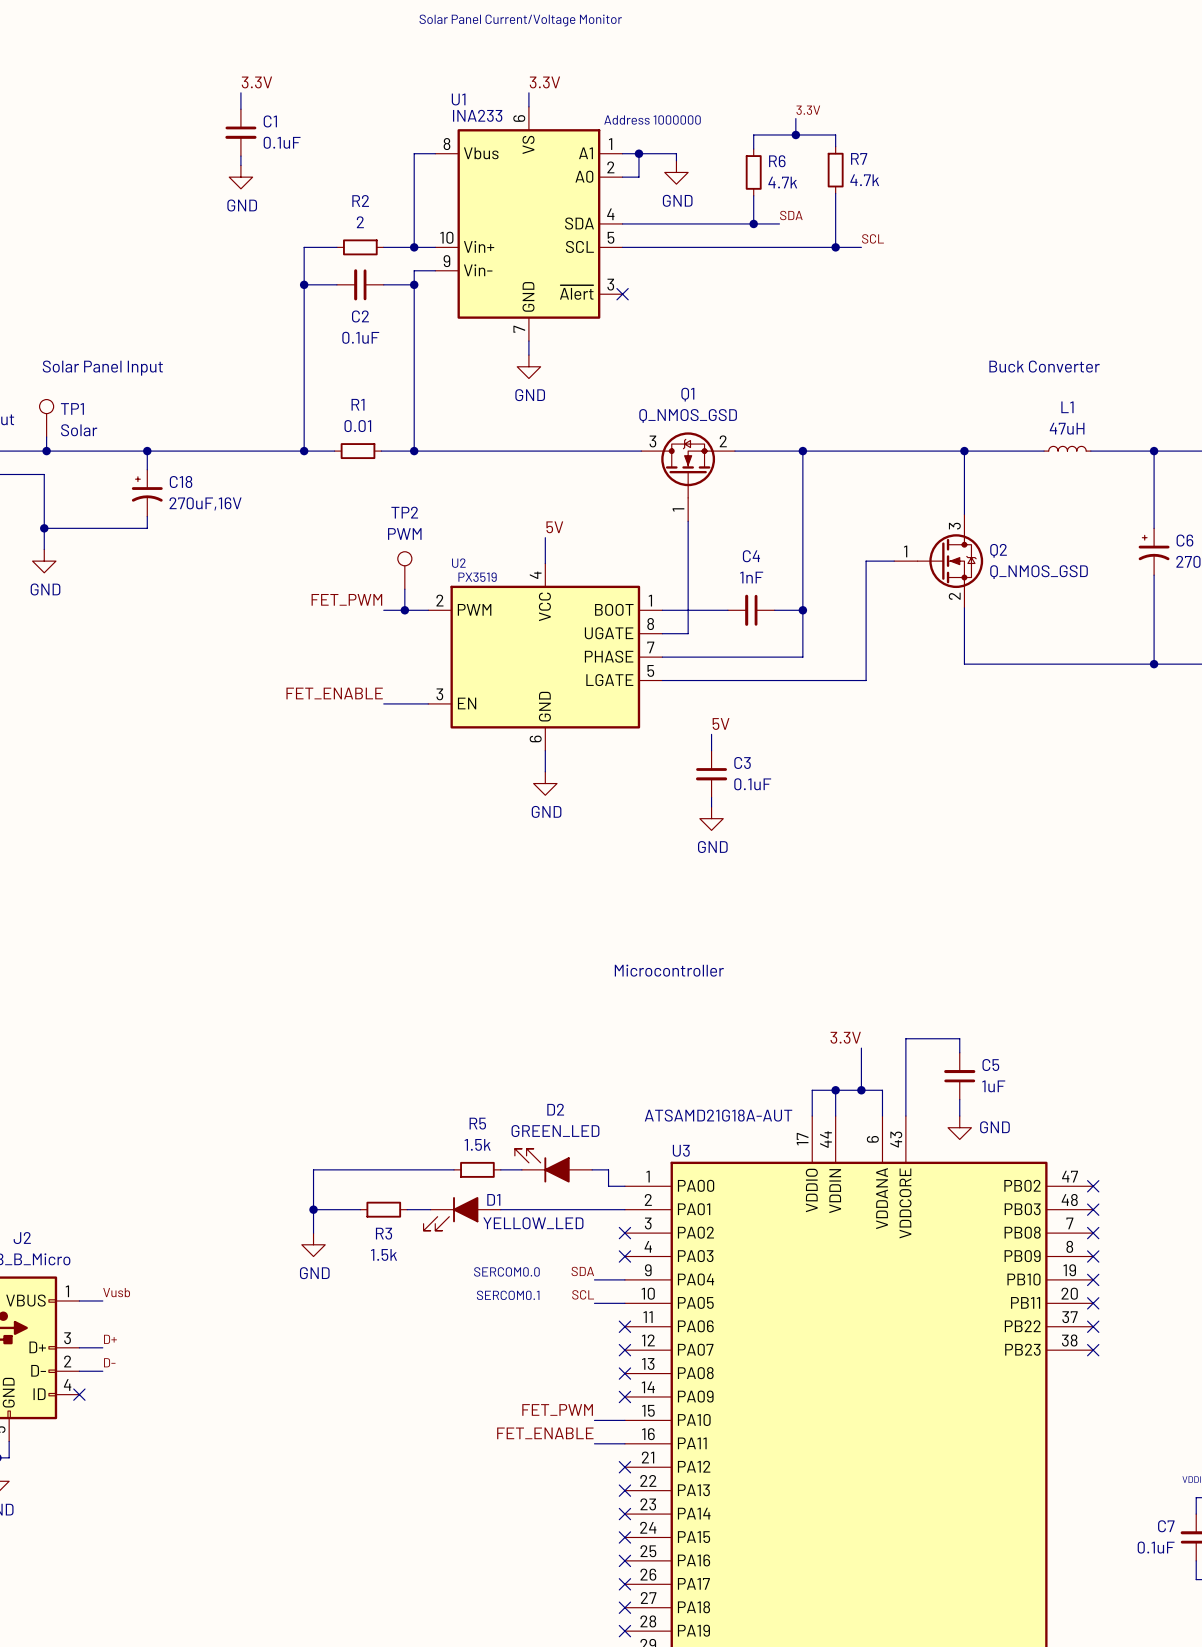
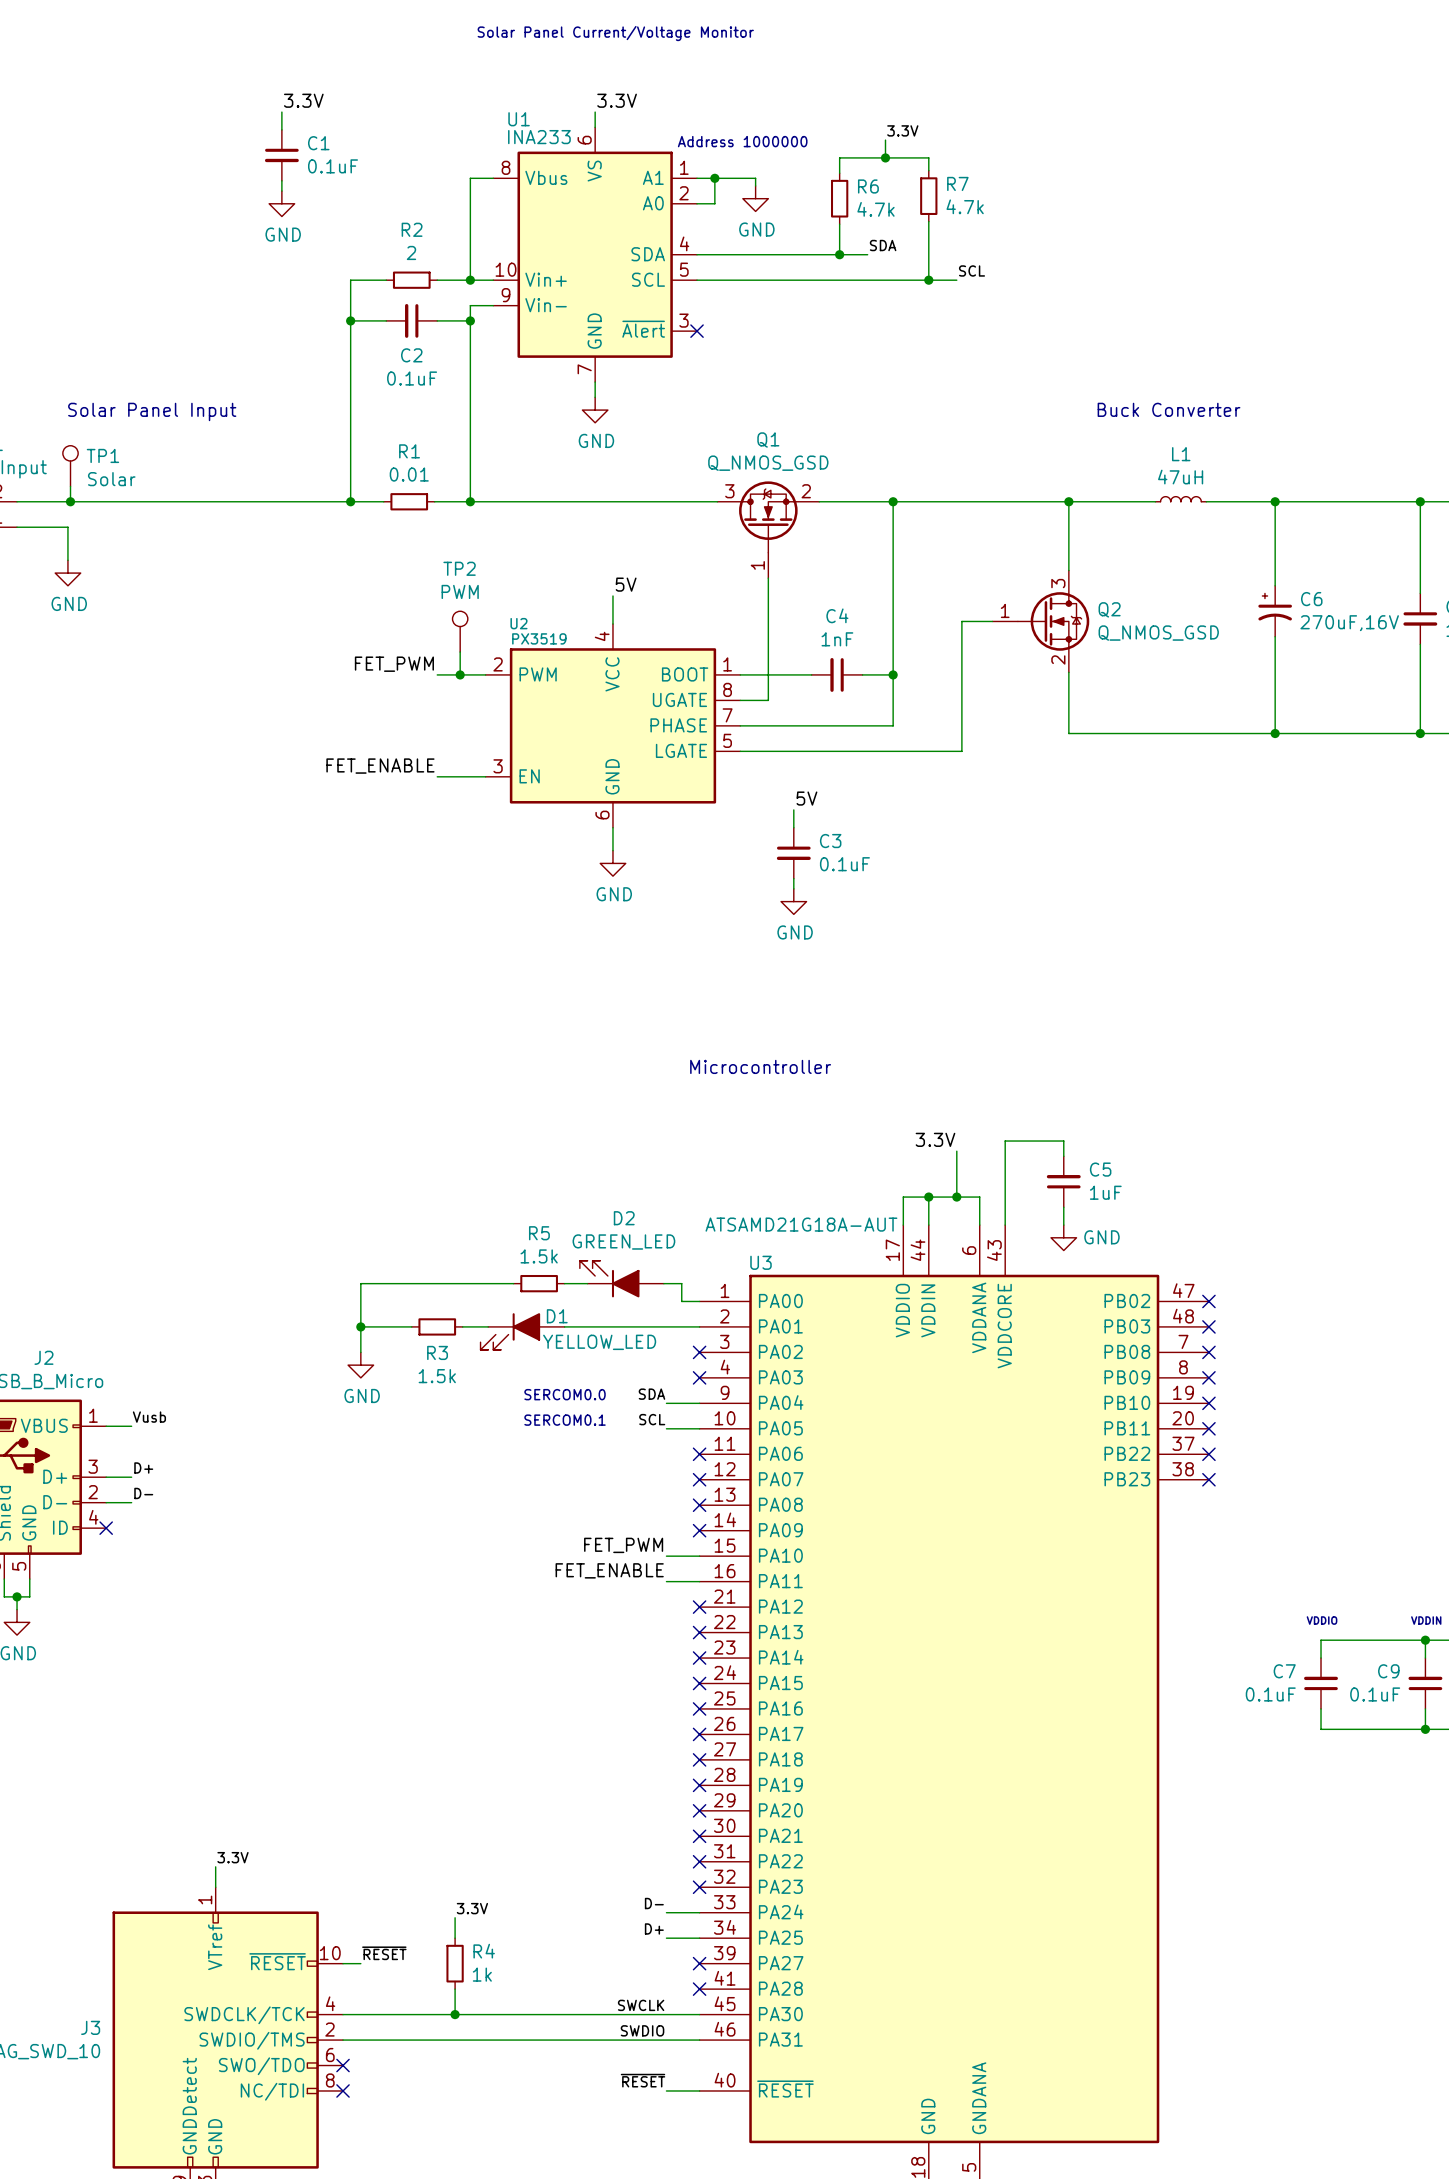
wire: (147, 451) (147, 469) -> none
junction: (147, 451) -> none
C18: 270uF,16V (147, 493) -> none
wire: (44, 504) (44, 549) -> none
wire: (147, 516) (147, 528) (44, 528) -> none
junction: (44, 528) -> none
power symbol position: GND (44, 561) -> GND (67, 573)

